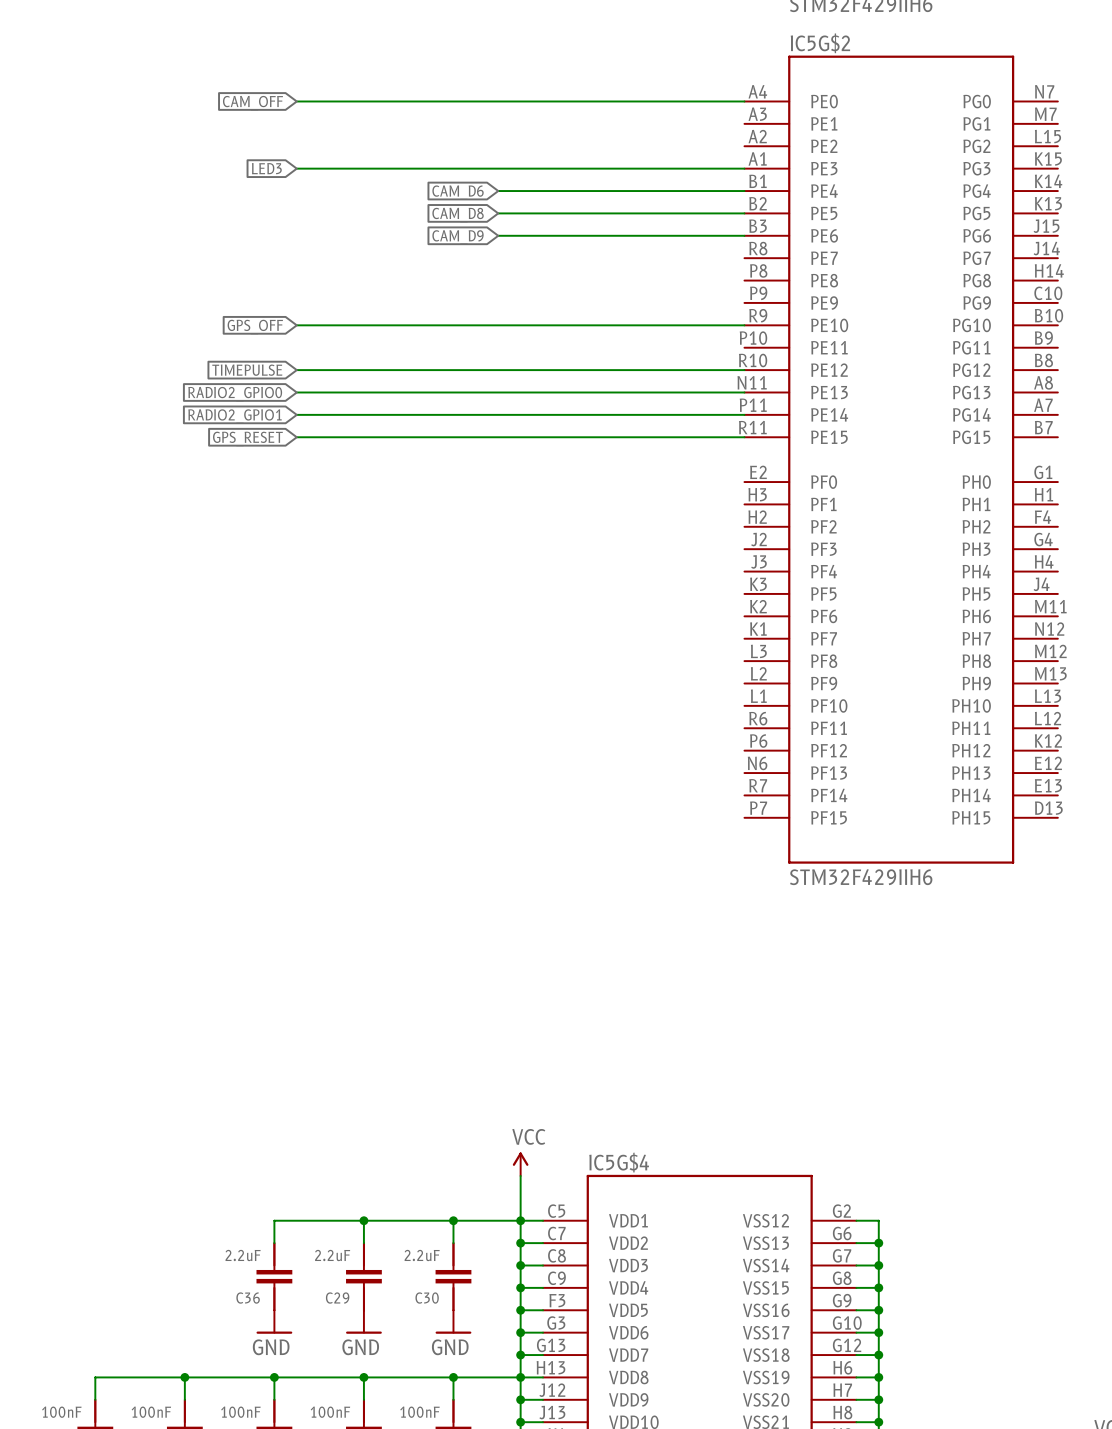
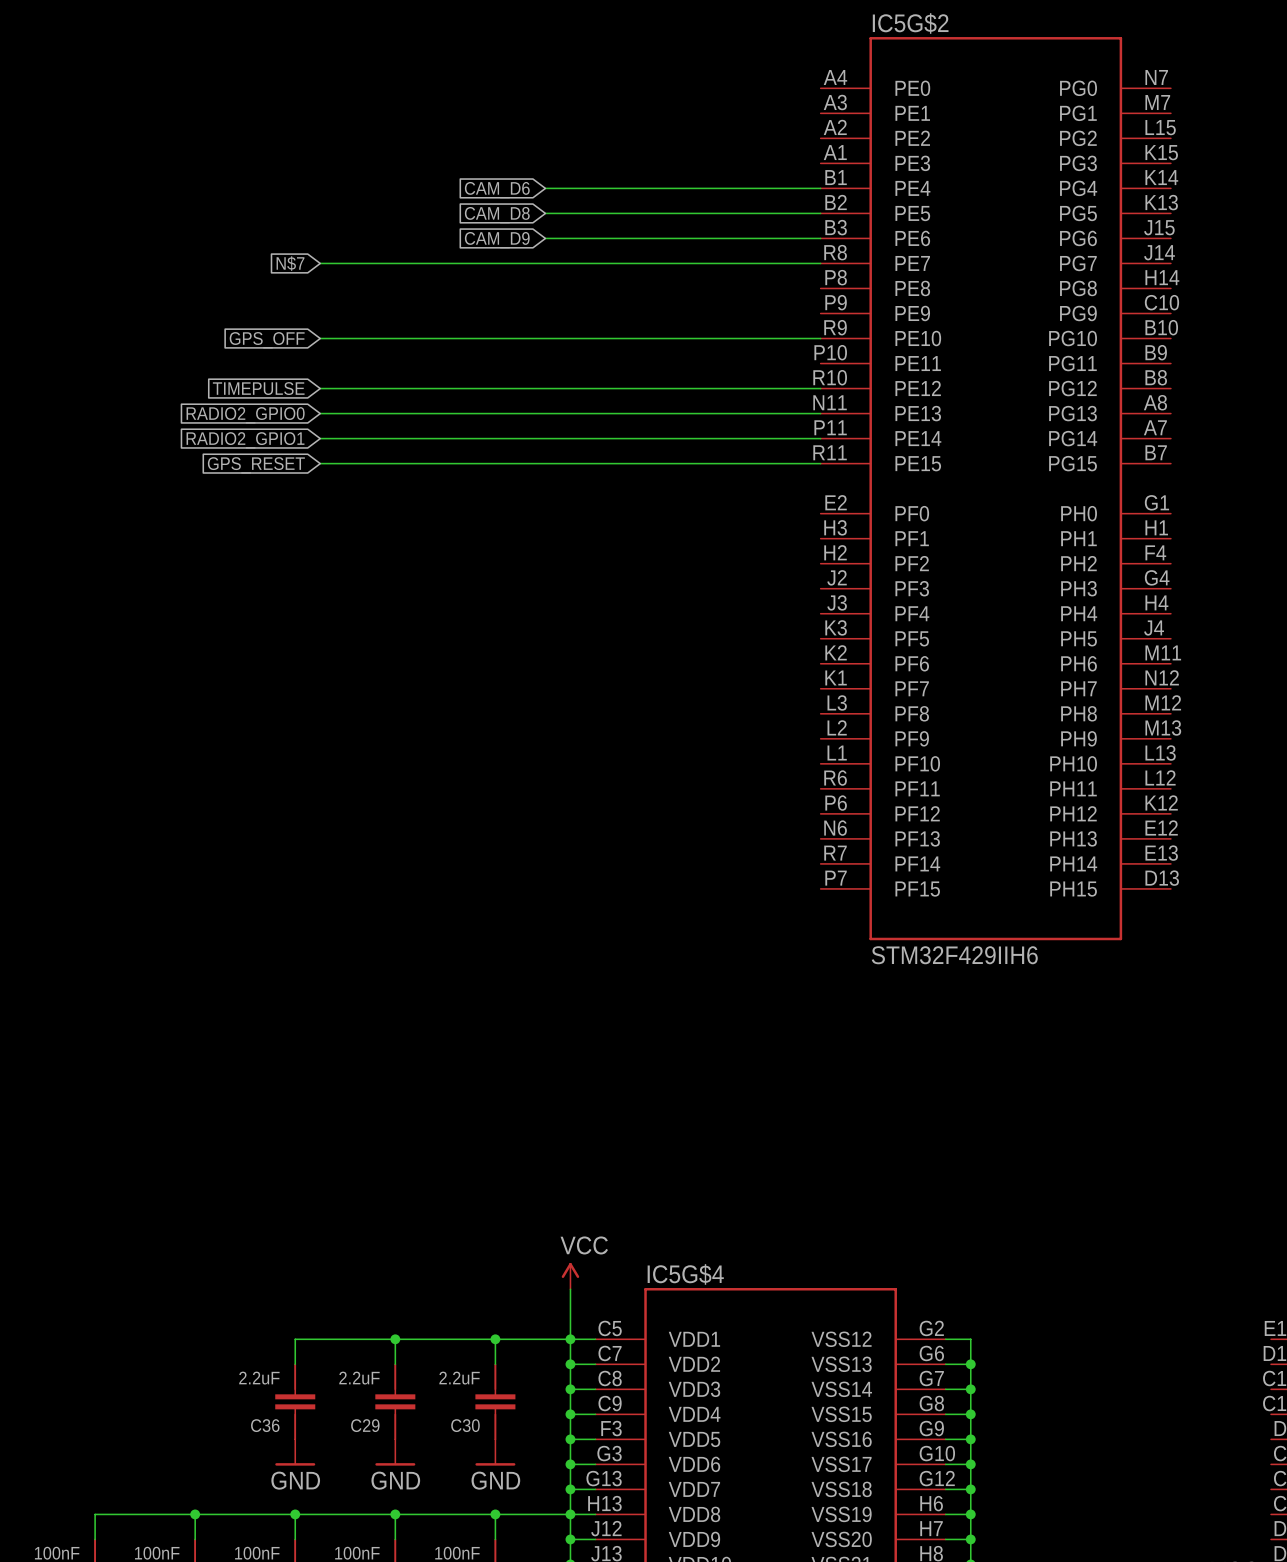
wire: (296, 101) (744, 101) -> none
global label: CAM_OFF (252, 103) -> none
global label: LED3 (266, 168) -> none
wire: (296, 168) (744, 168) -> (320, 263) (820, 263)
global label: none -> N$7 (290, 263)

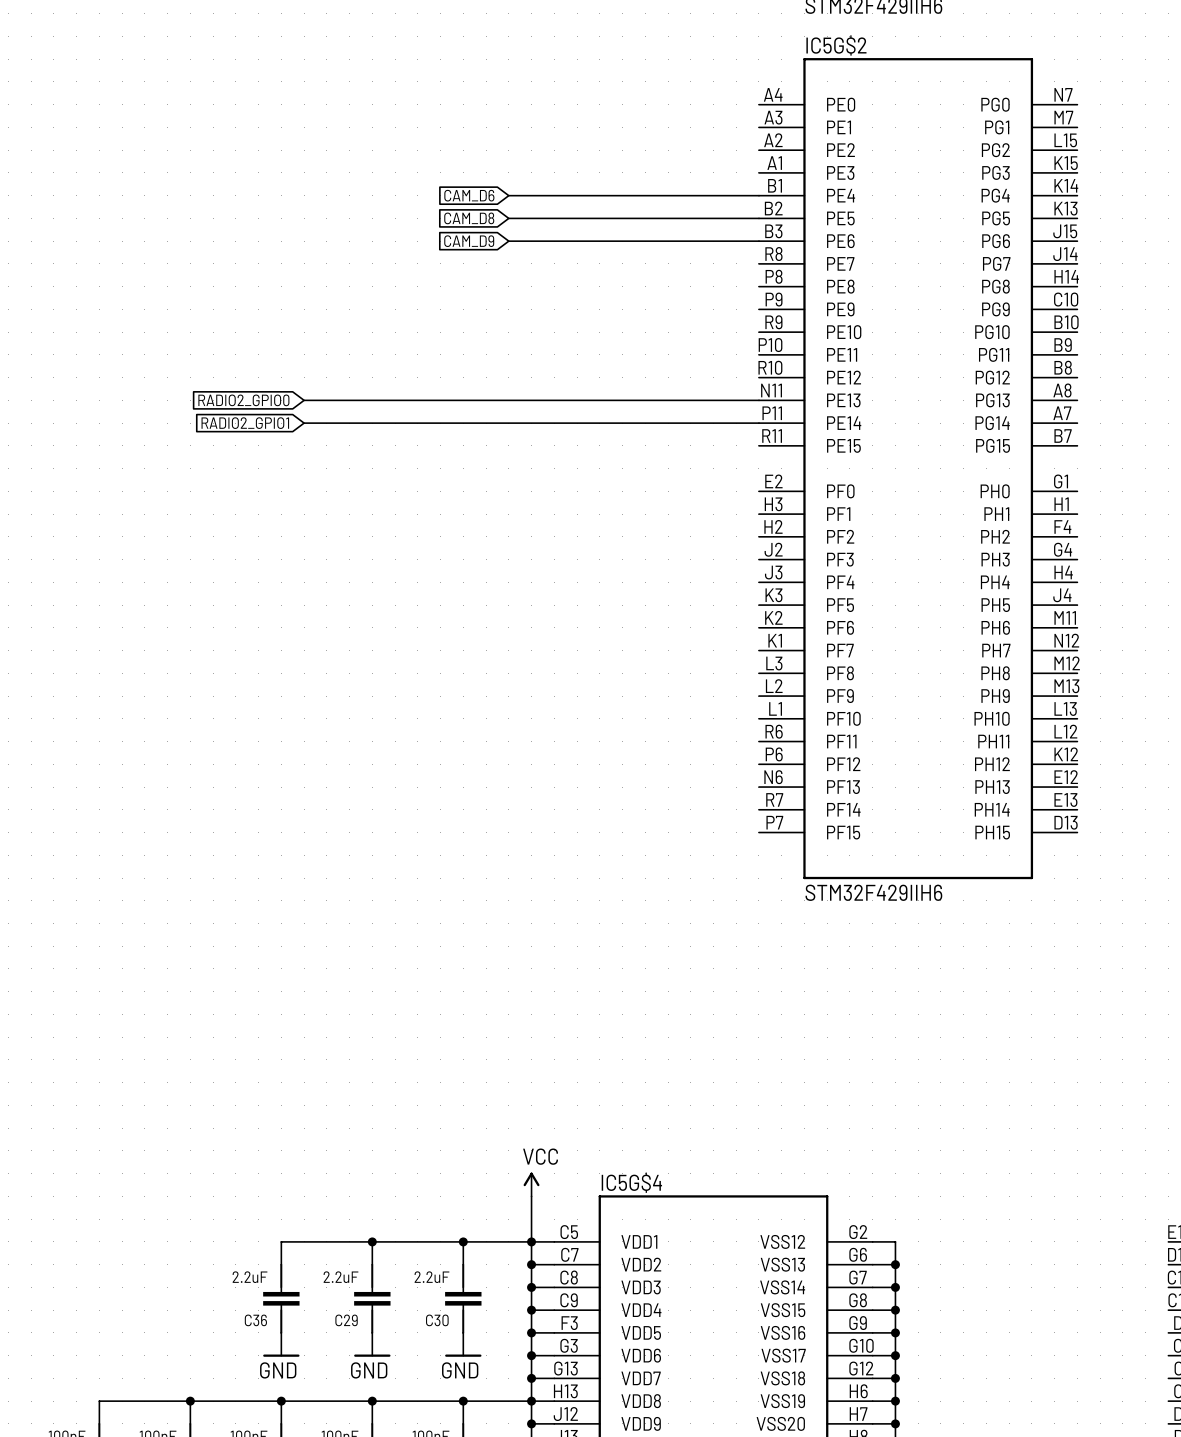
global label: N$7 (290, 263) -> none
wire: (320, 263) (820, 263) -> none
wire: (320, 338) (820, 338) -> none
global label: GPS_OFF (267, 340) -> none
global label: TIMEPULSE (258, 388) -> none
wire: (320, 388) (820, 388) -> none
wire: (320, 463) (820, 463) -> none
global label: GPS_RESET (256, 465) -> none

